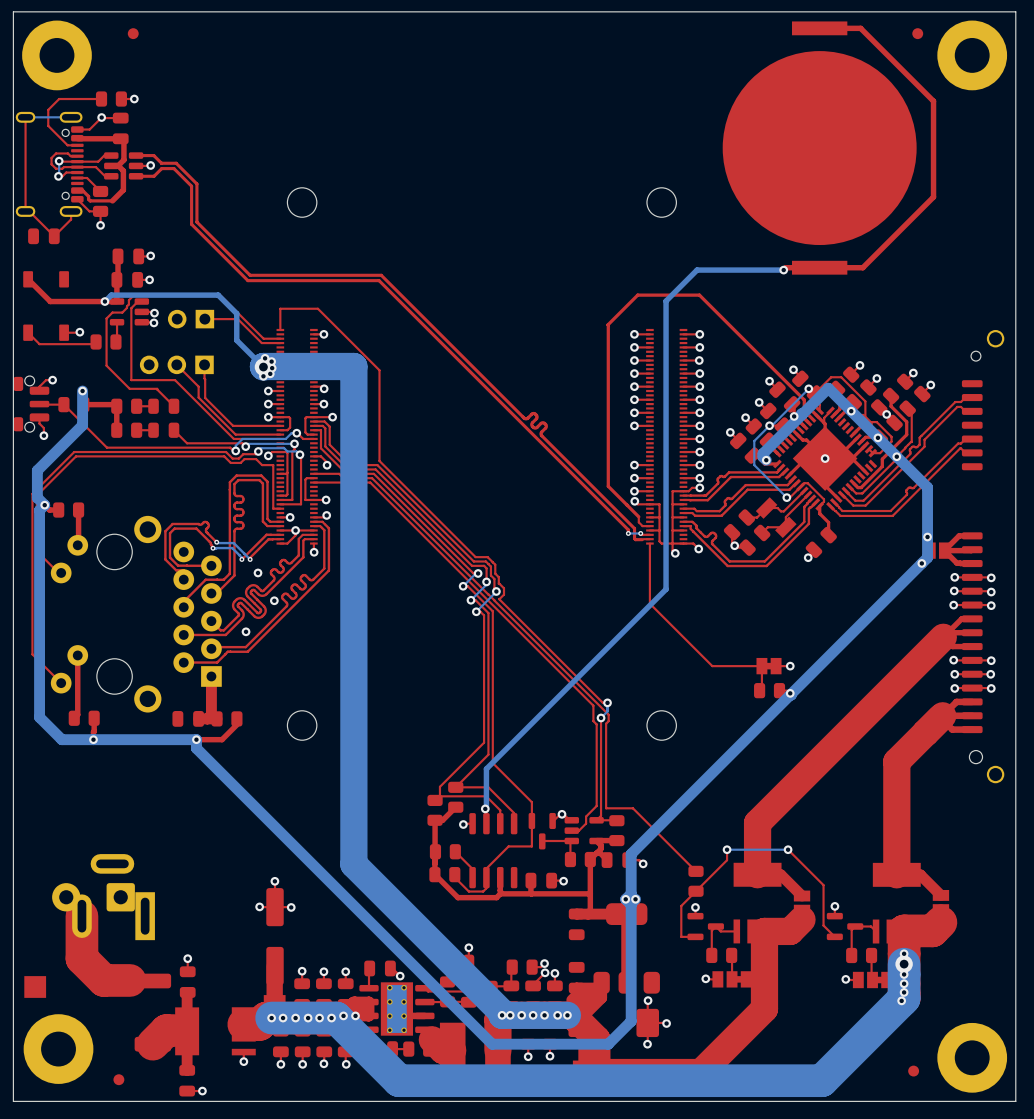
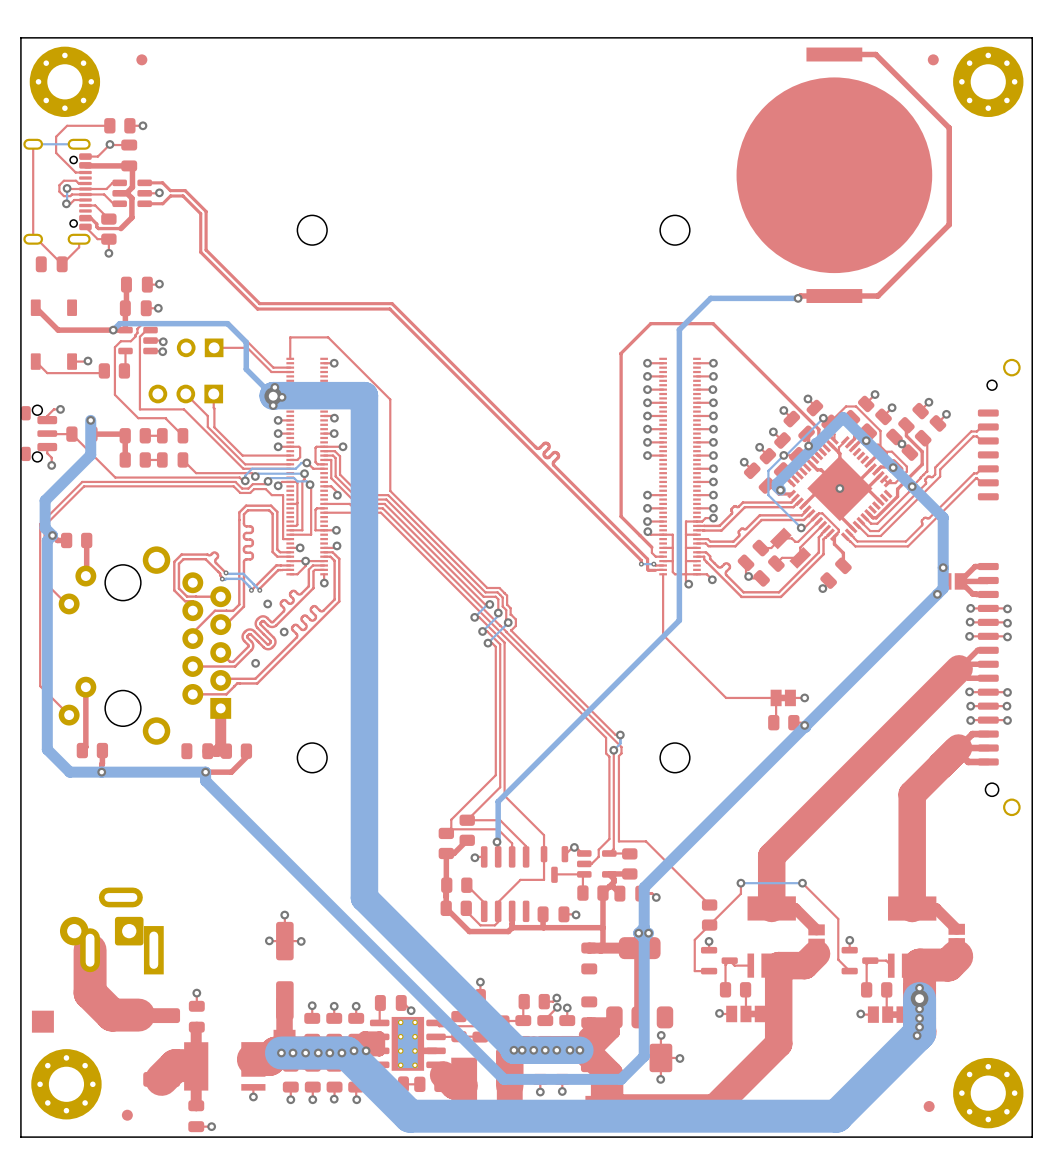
part footprint: [22, 20, 92, 91] -> [29, 46, 101, 118]
part footprint: [937, 20, 1008, 91] -> [953, 46, 1024, 118]
via: (271, 361) -> none
via: (270, 373) -> none
part footprint: [23, 1014, 94, 1084] -> [31, 1049, 102, 1120]
part footprint: [937, 1022, 1008, 1093] -> [953, 1057, 1024, 1129]

